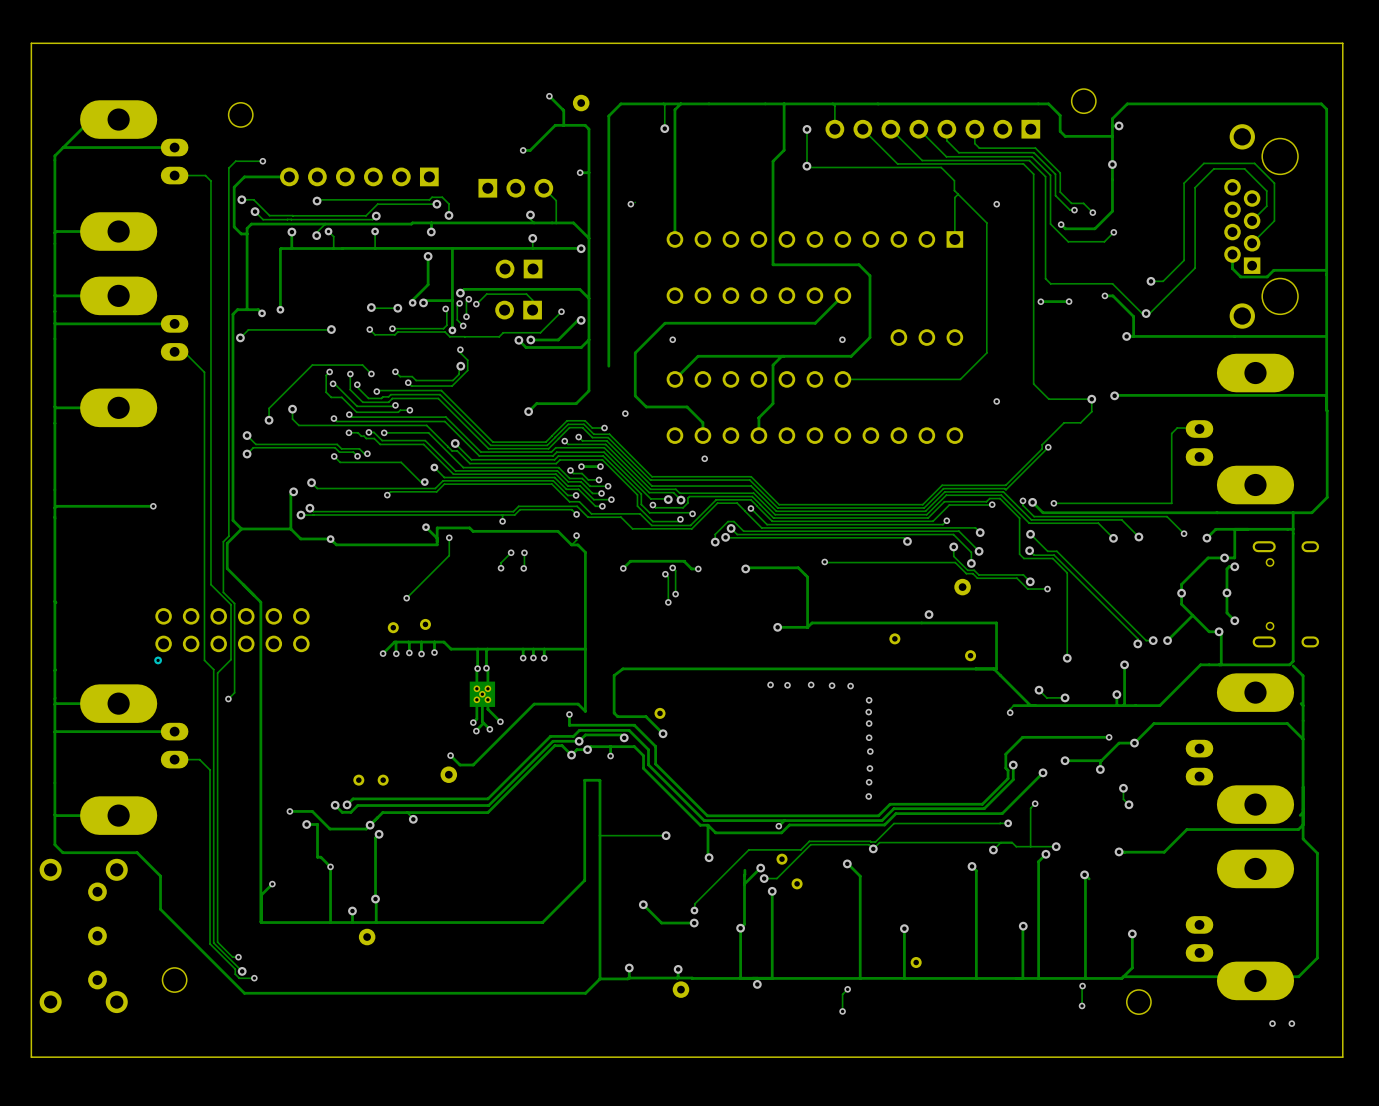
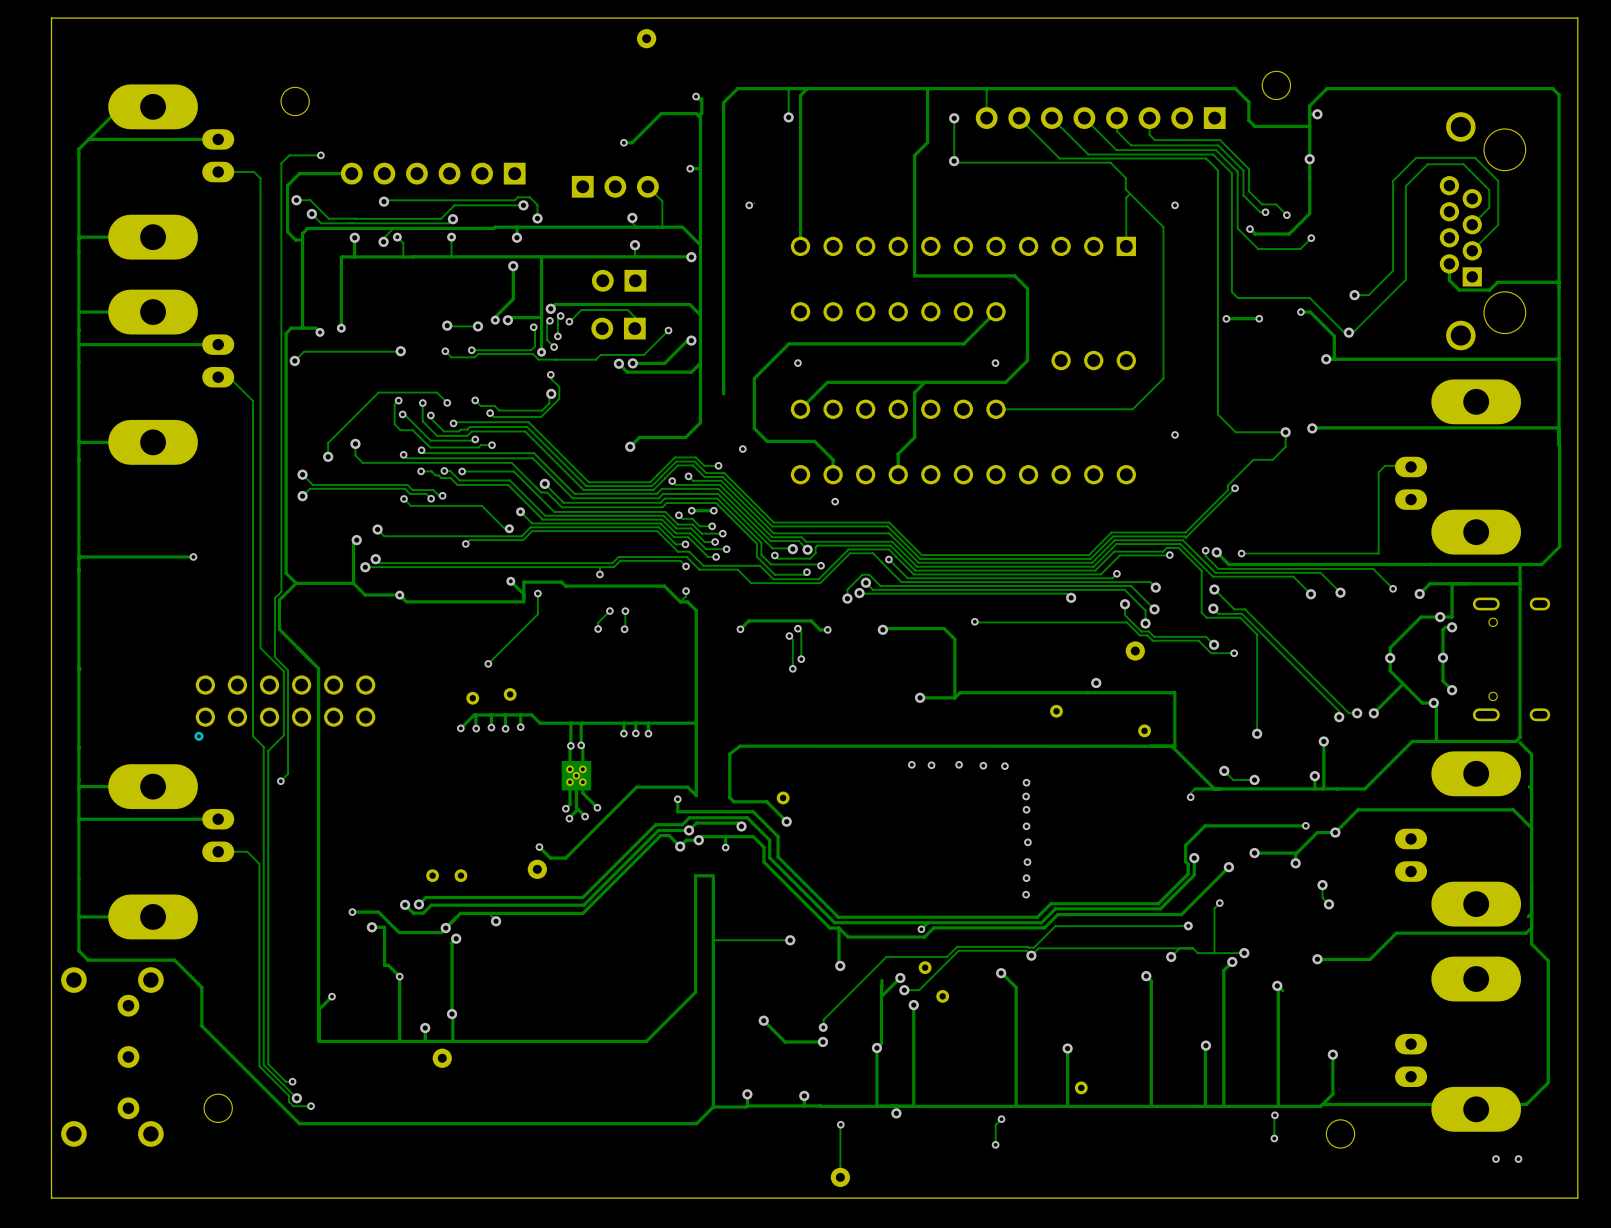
track: (549, 96) (563, 110) (563, 125) -> none
via position: (549, 96) -> (696, 96)
part position: (581, 103) -> (646, 38)
track: none -> (696, 96) (701, 99) (700, 117)
part position: (680, 989) -> (840, 1177)
track: none -> (840, 1124) (840, 1177)
via: none -> (840, 1124)

